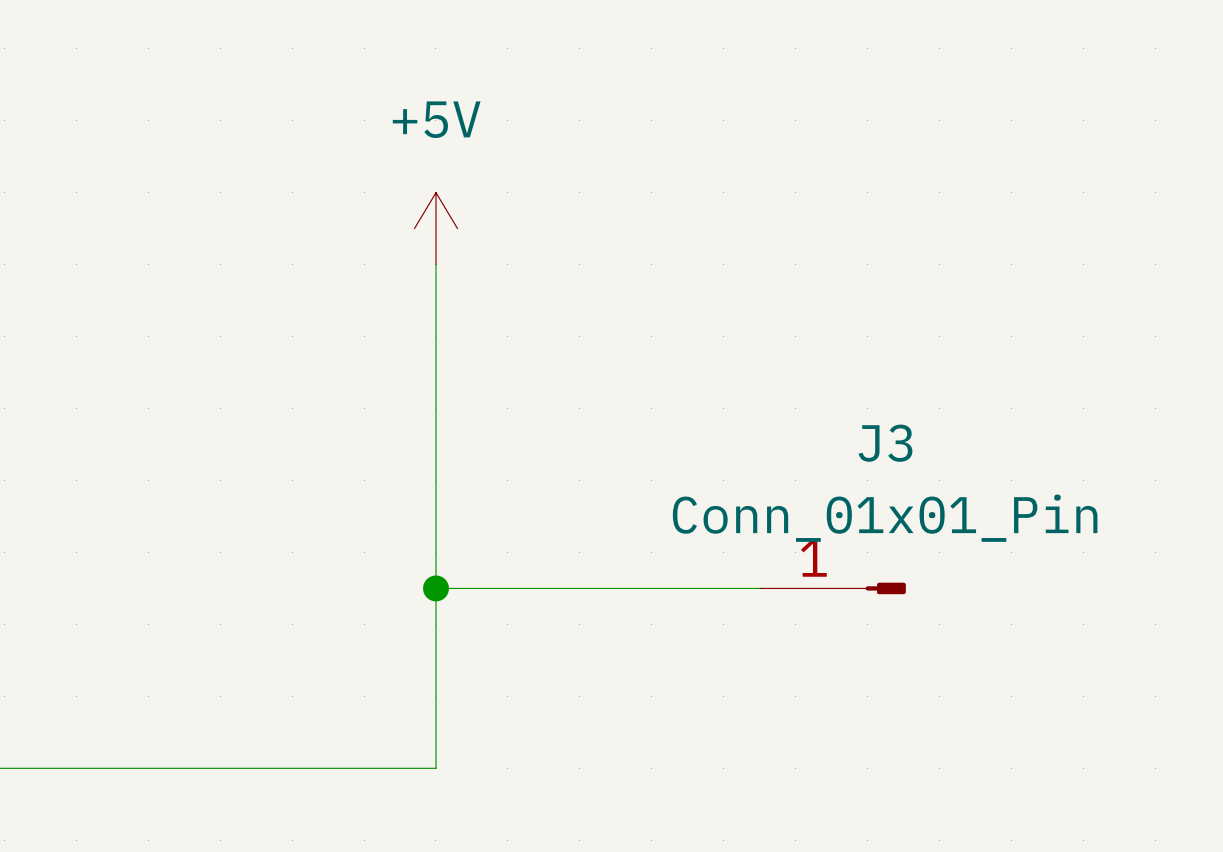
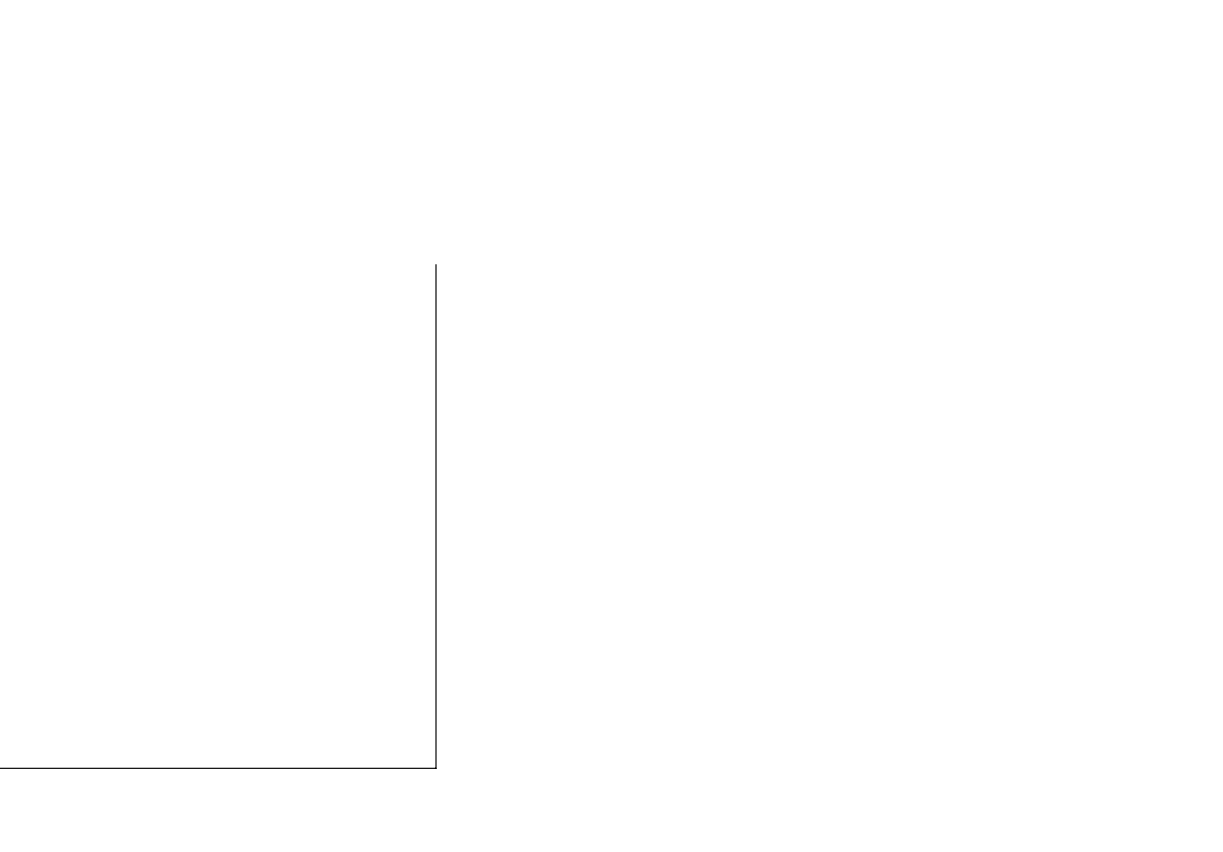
power symbol: +5V (435, 228) -> none
wire: (435, 588) (759, 588) -> none
junction: (435, 588) -> none
J3: Conn_01x01_Pin (832, 588) -> none

